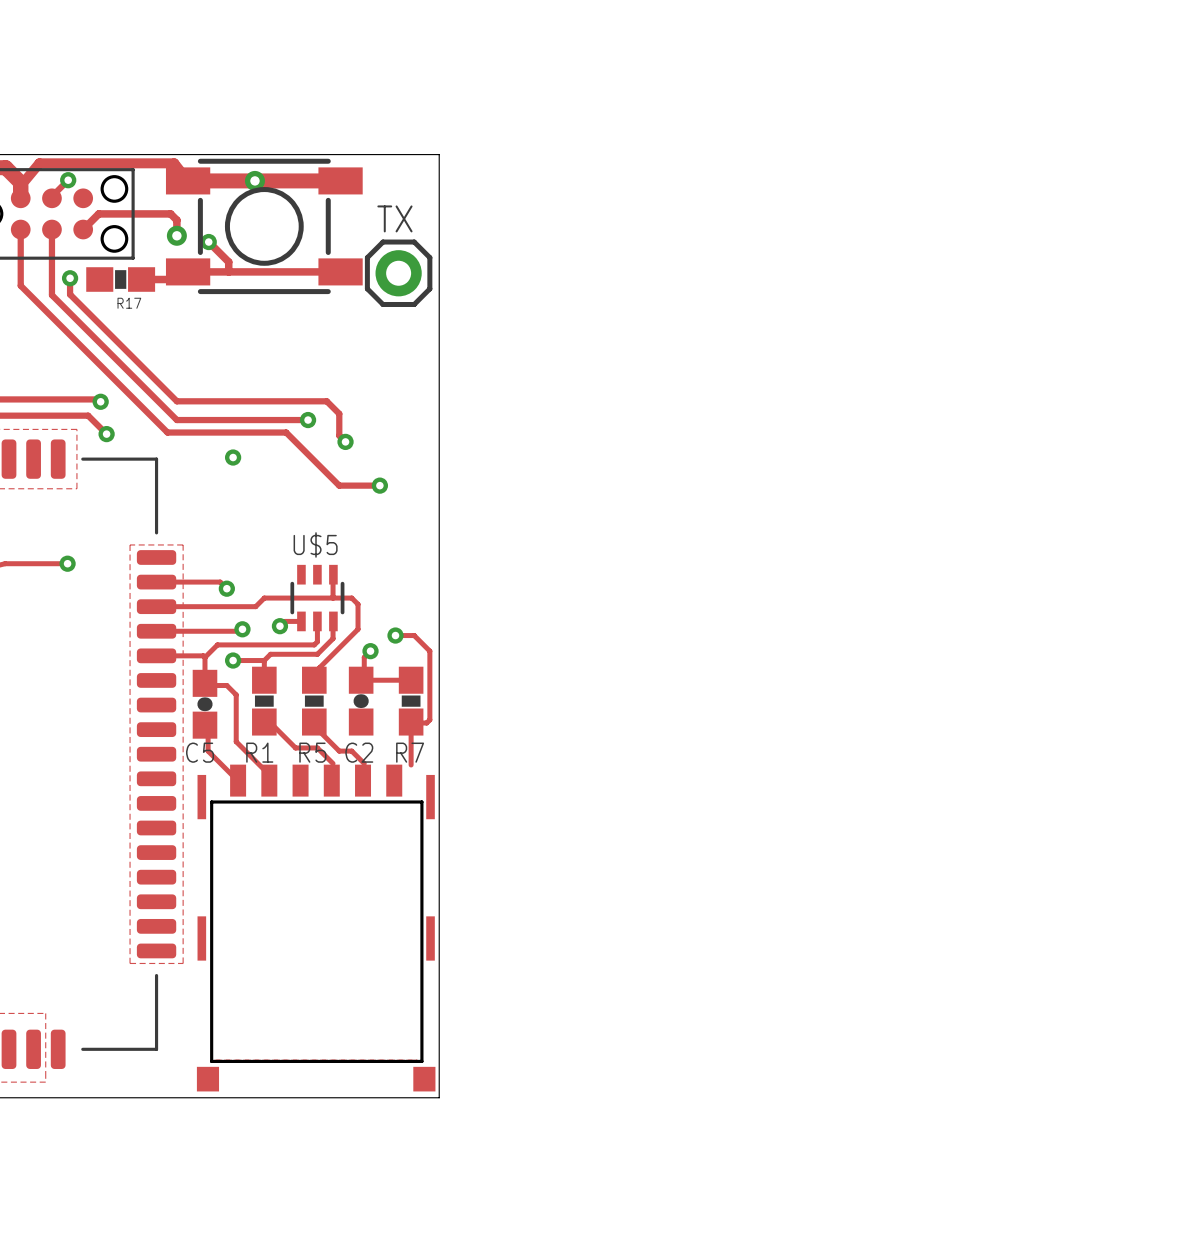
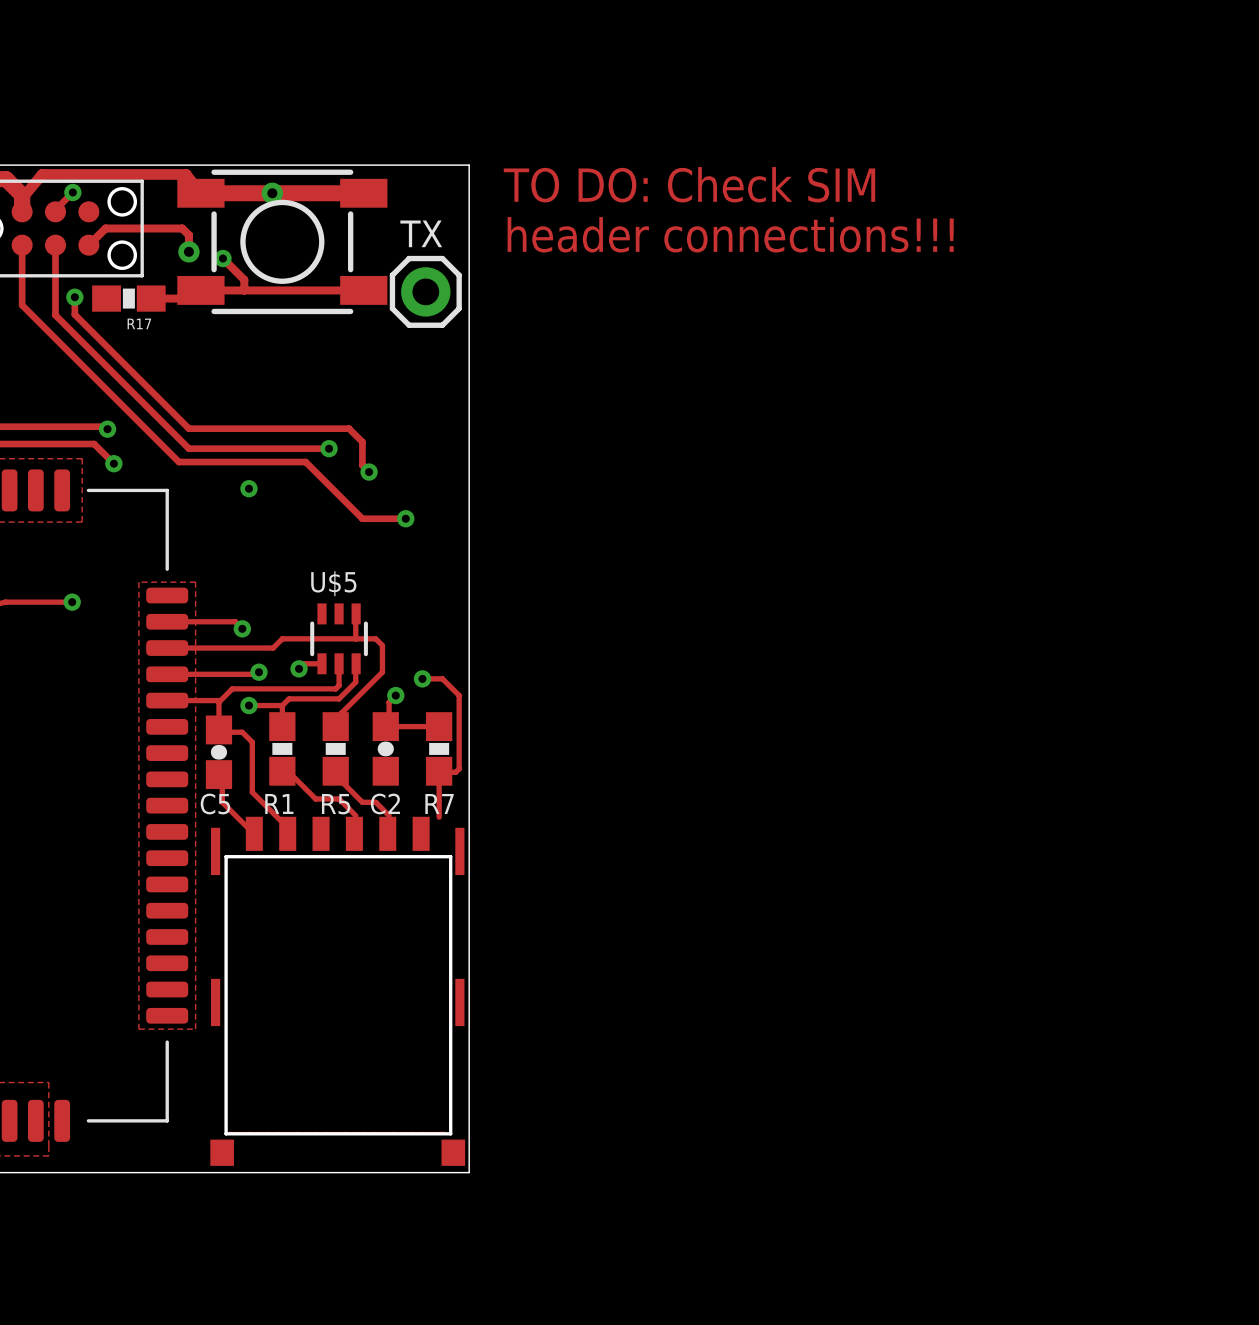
text: none -> TO DO: Check SIM (689, 184)
text: none -> header connections!!! (730, 234)

